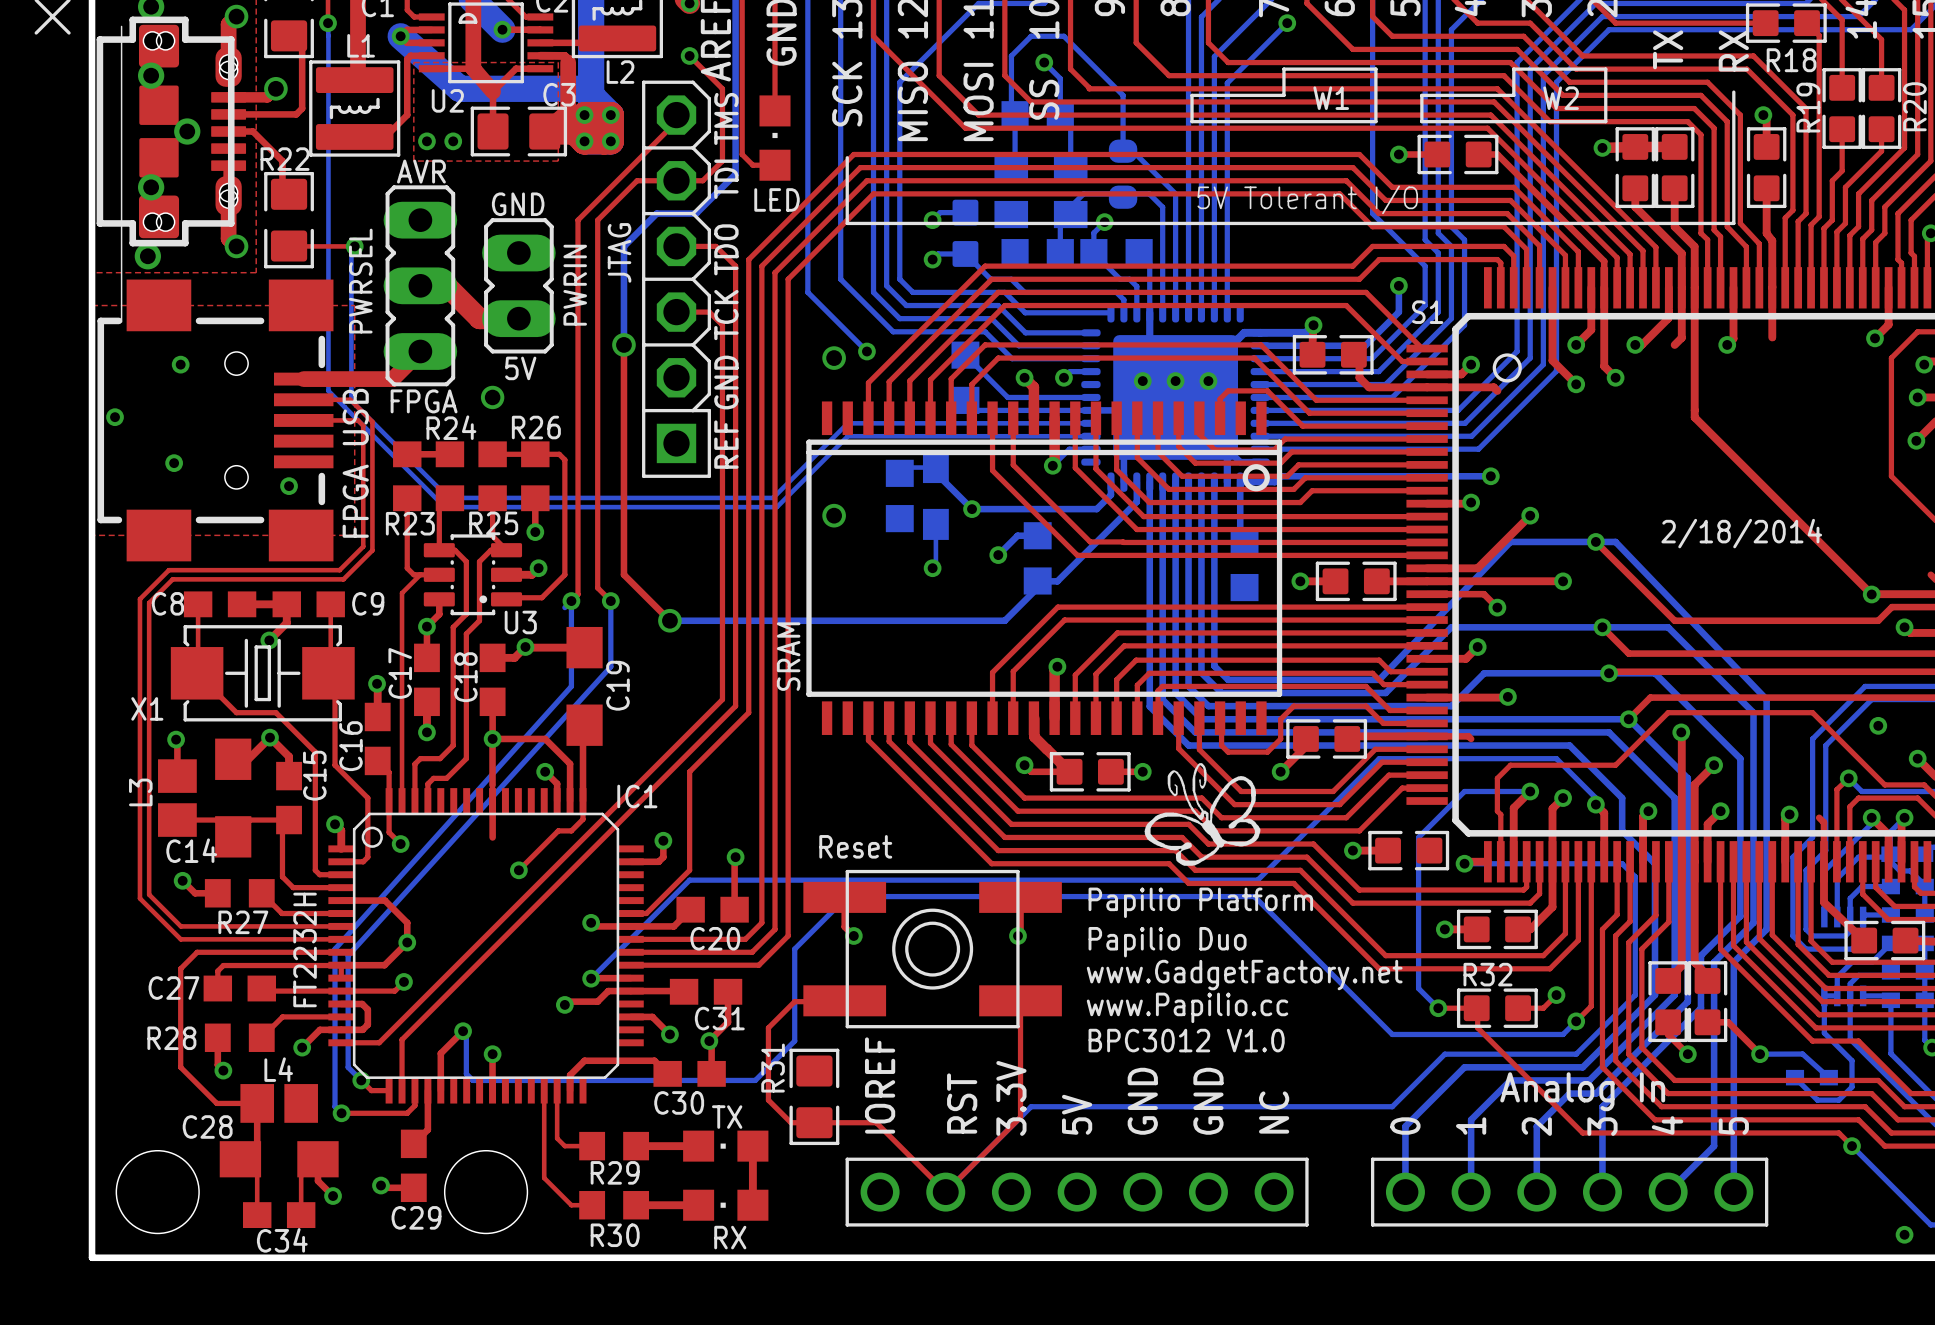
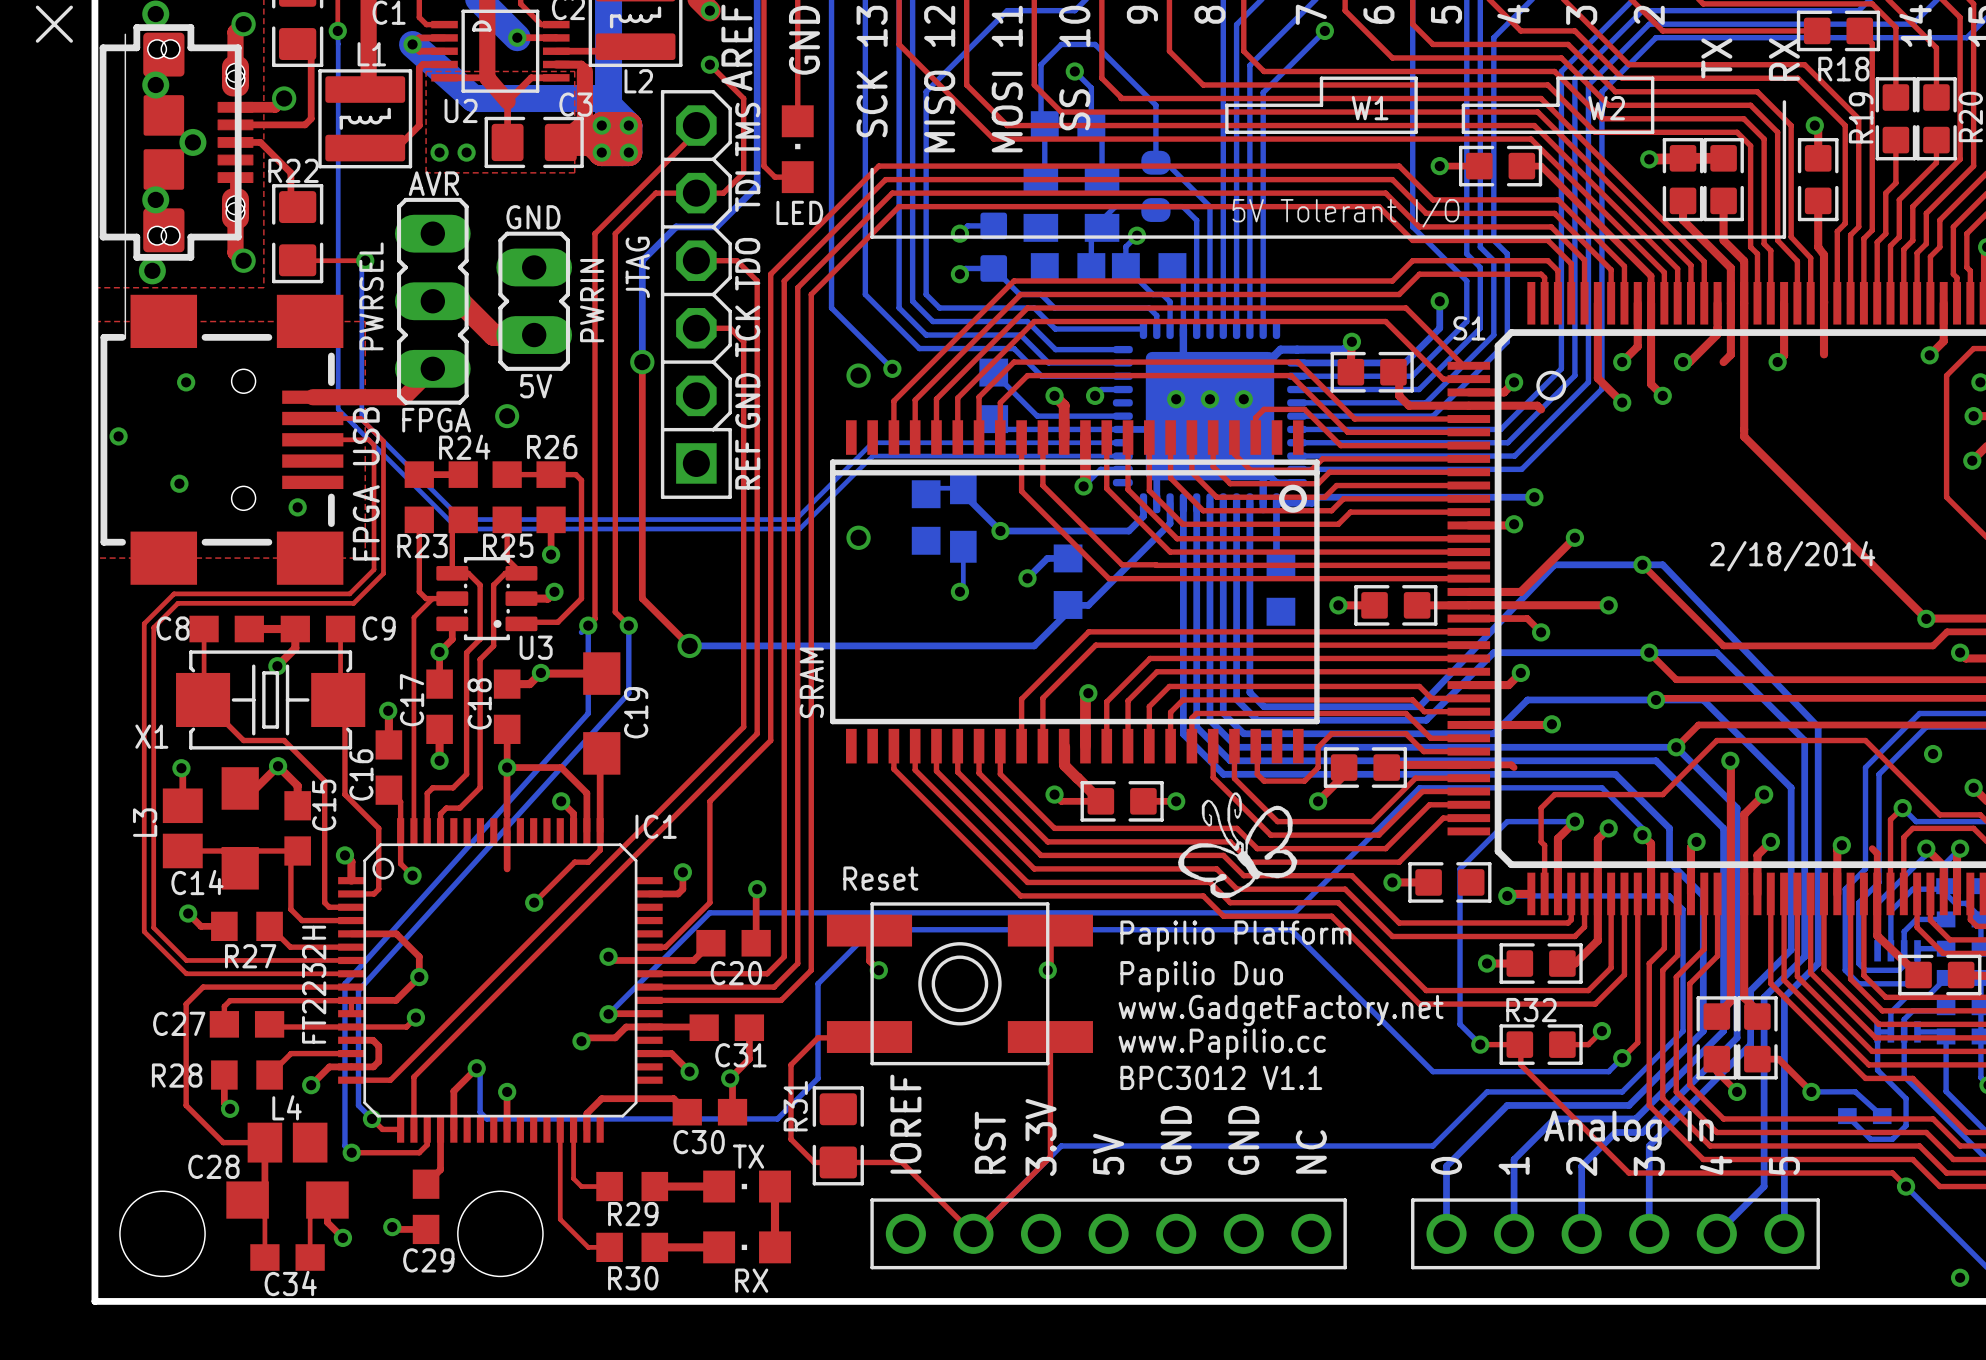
text: BPC3012 V1.0 (1186, 1040) -> BPC3012 V1.1 (1221, 1077)

